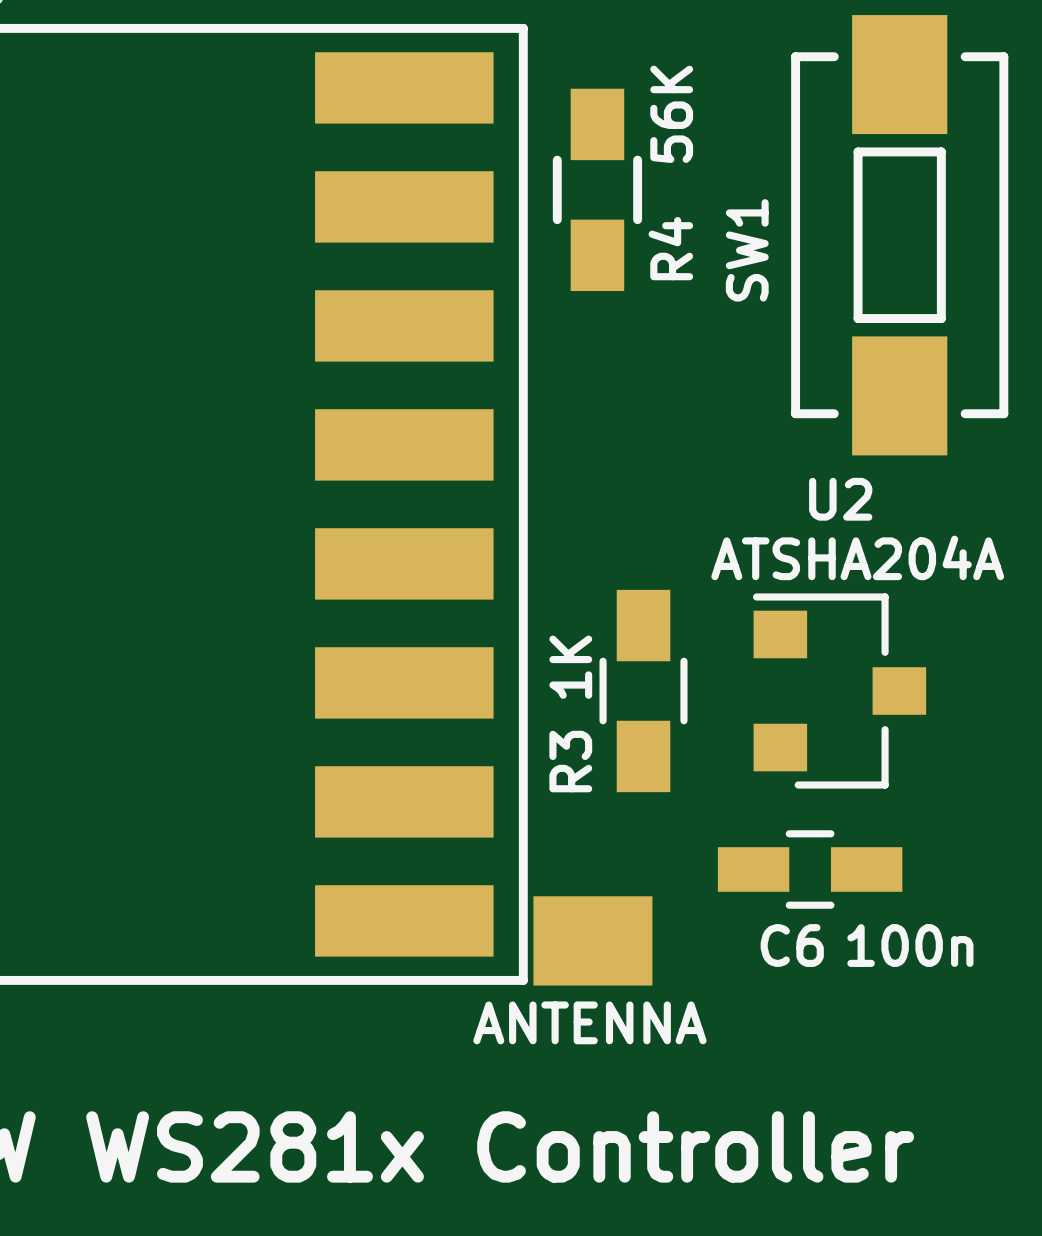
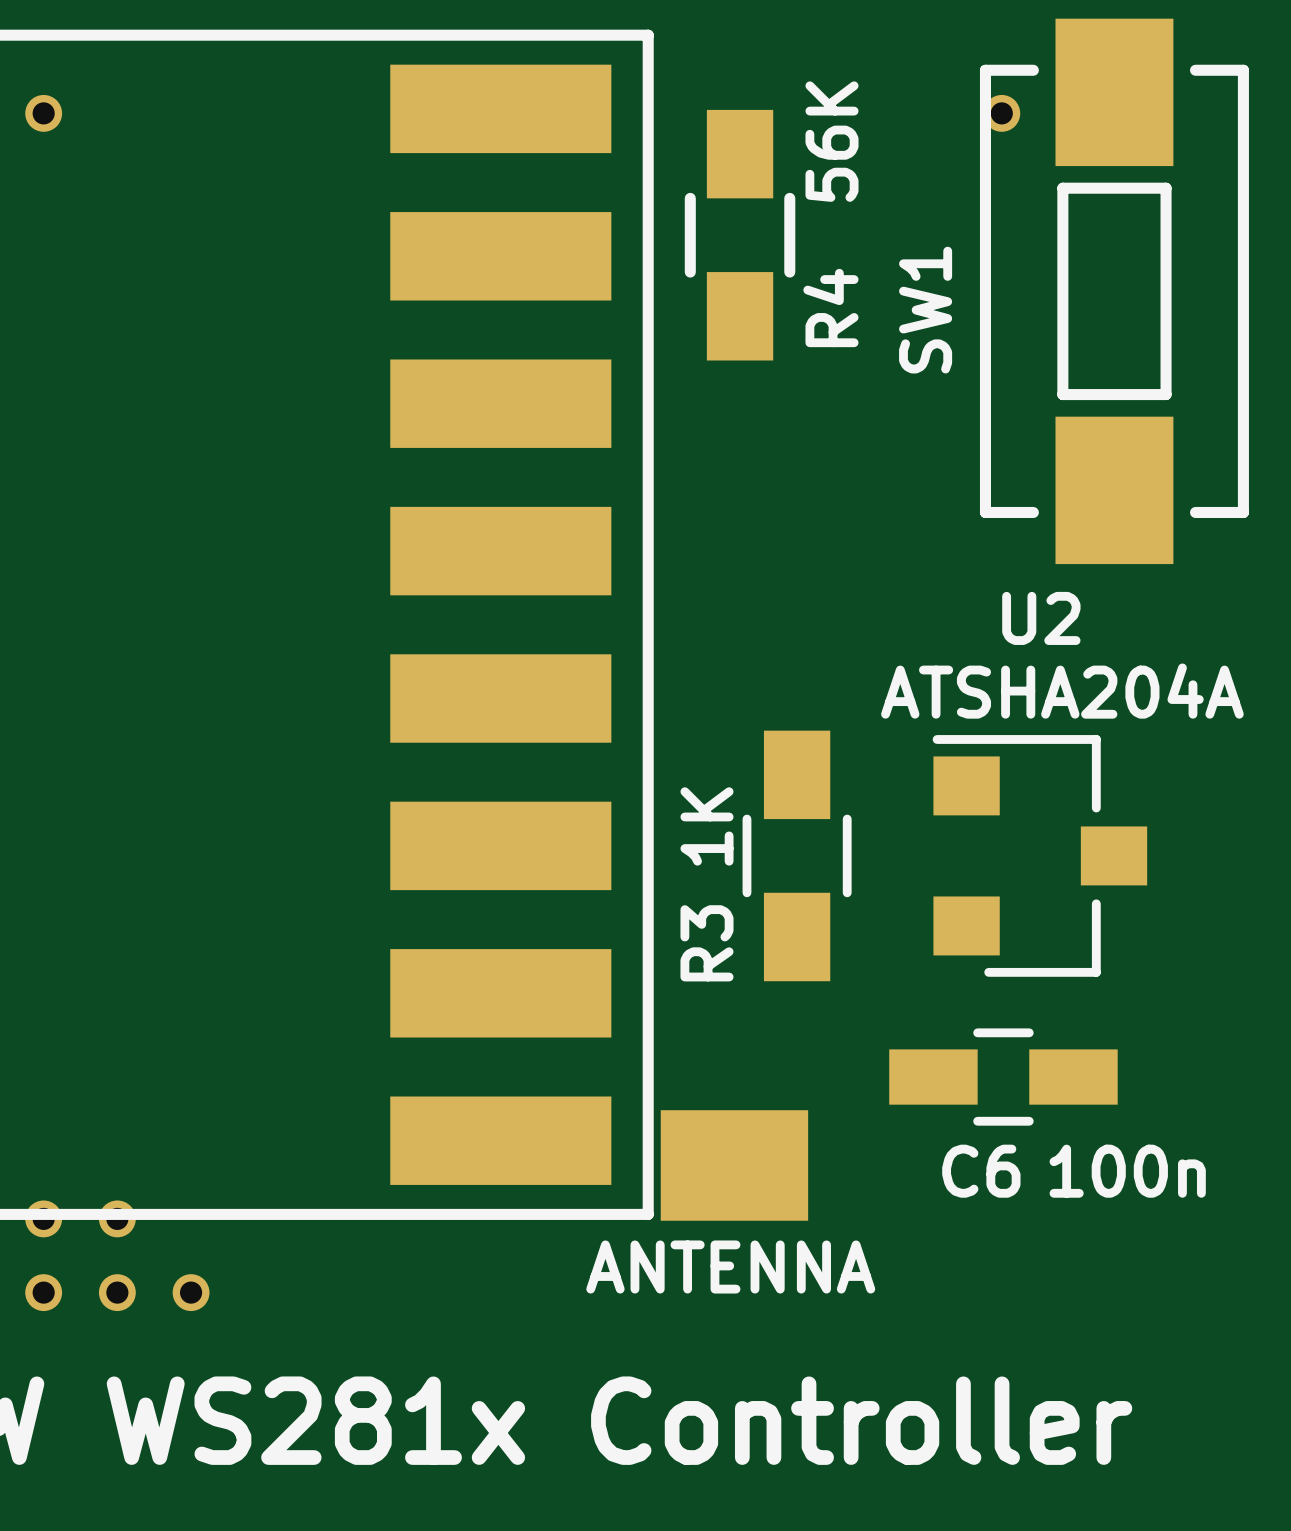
part: none -> (43, 113)
part: none -> (1001, 113)
part: none -> (43, 1218)
part: none -> (117, 1218)
part: none -> (43, 1292)
part: none -> (117, 1292)
part: none -> (191, 1292)

